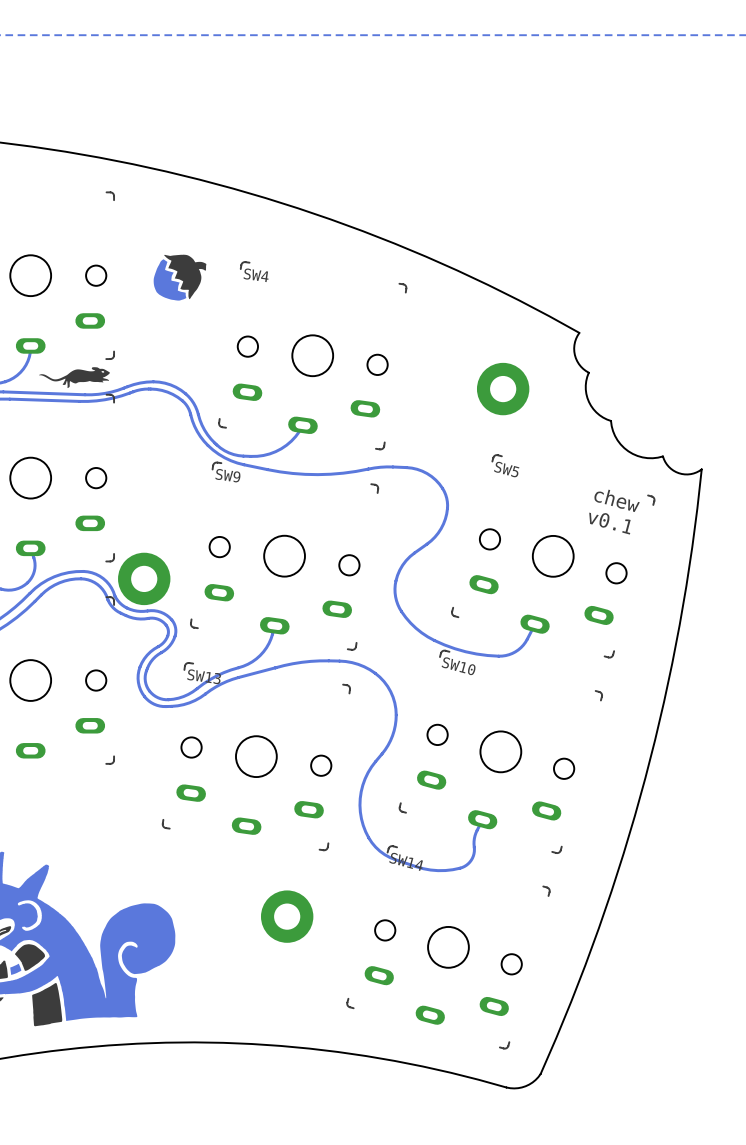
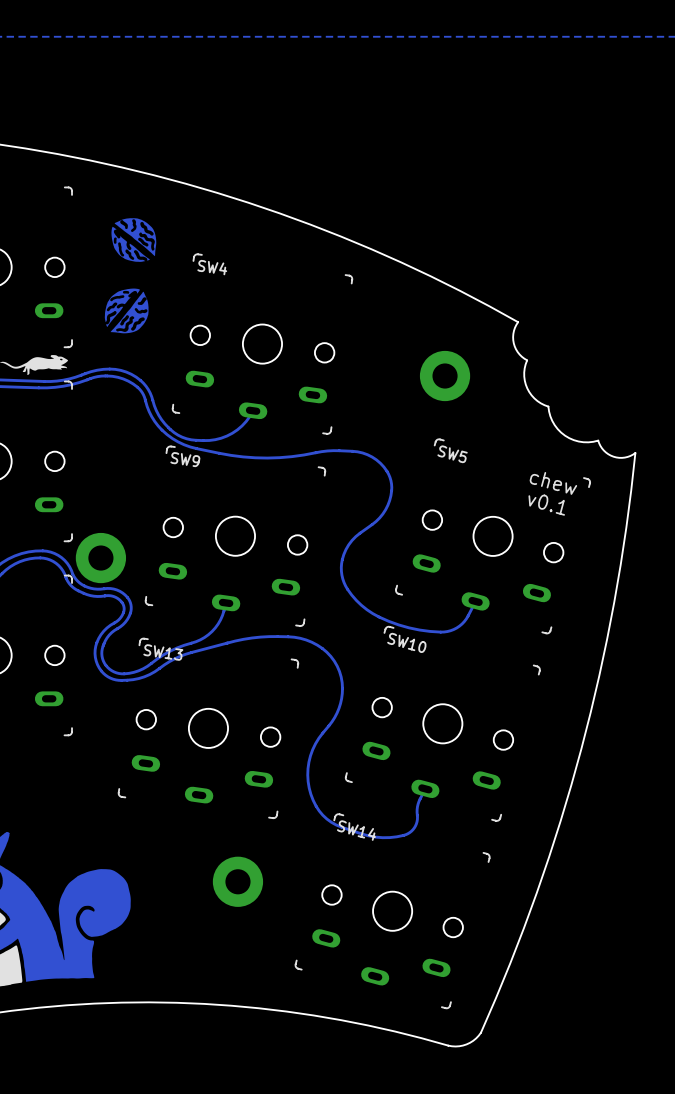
drawing: none -> [111, 218, 157, 262]
drawing: [153, 254, 207, 301] -> none
drawing: none -> [104, 288, 149, 334]

